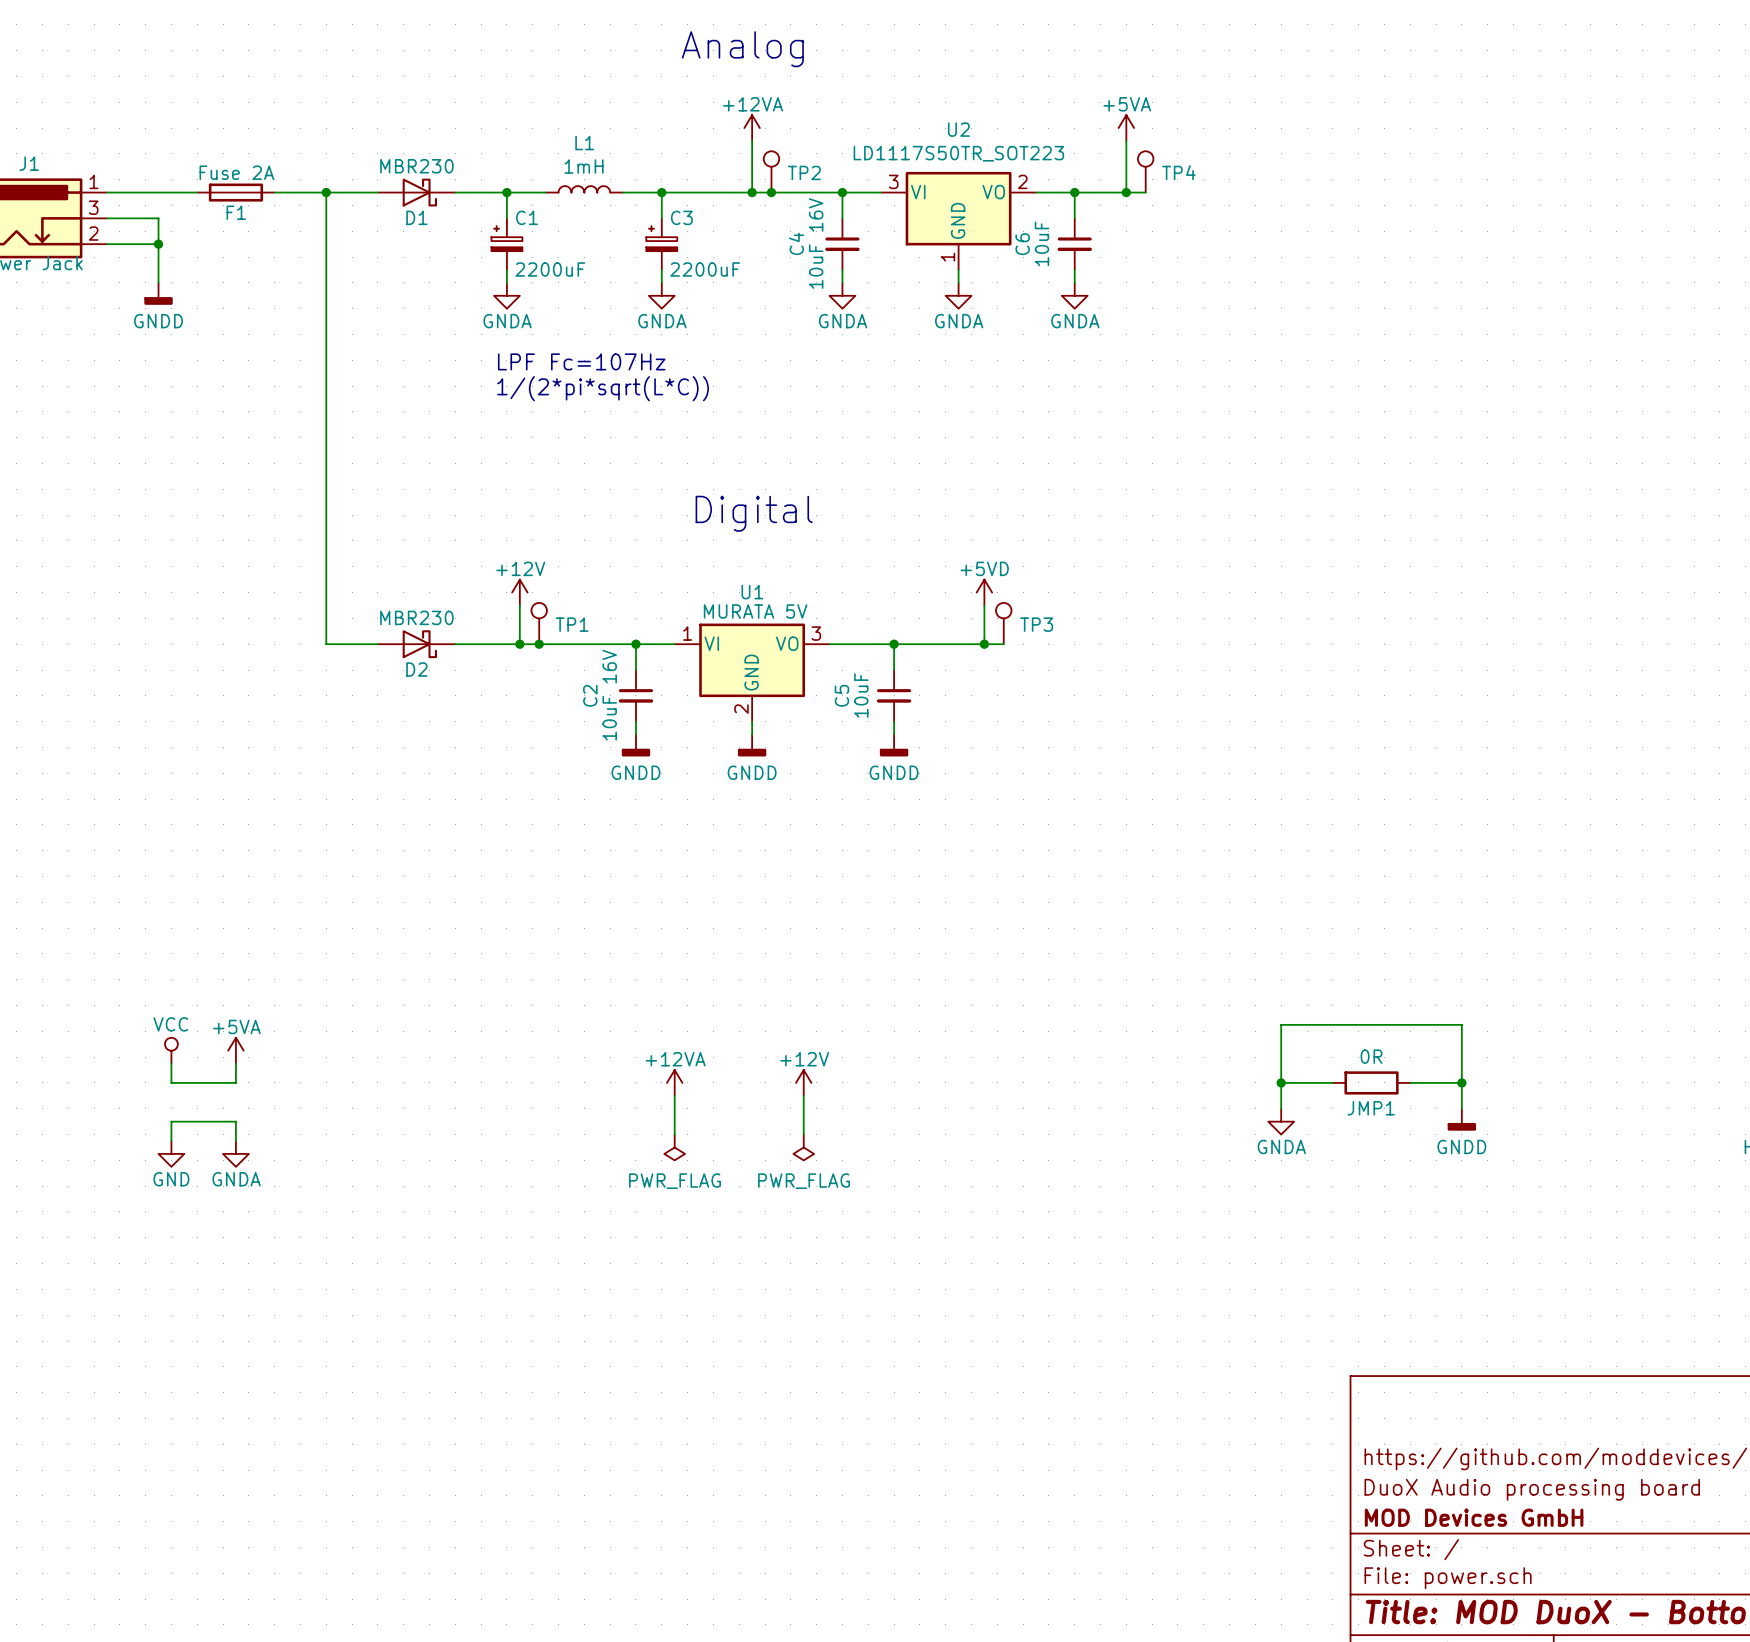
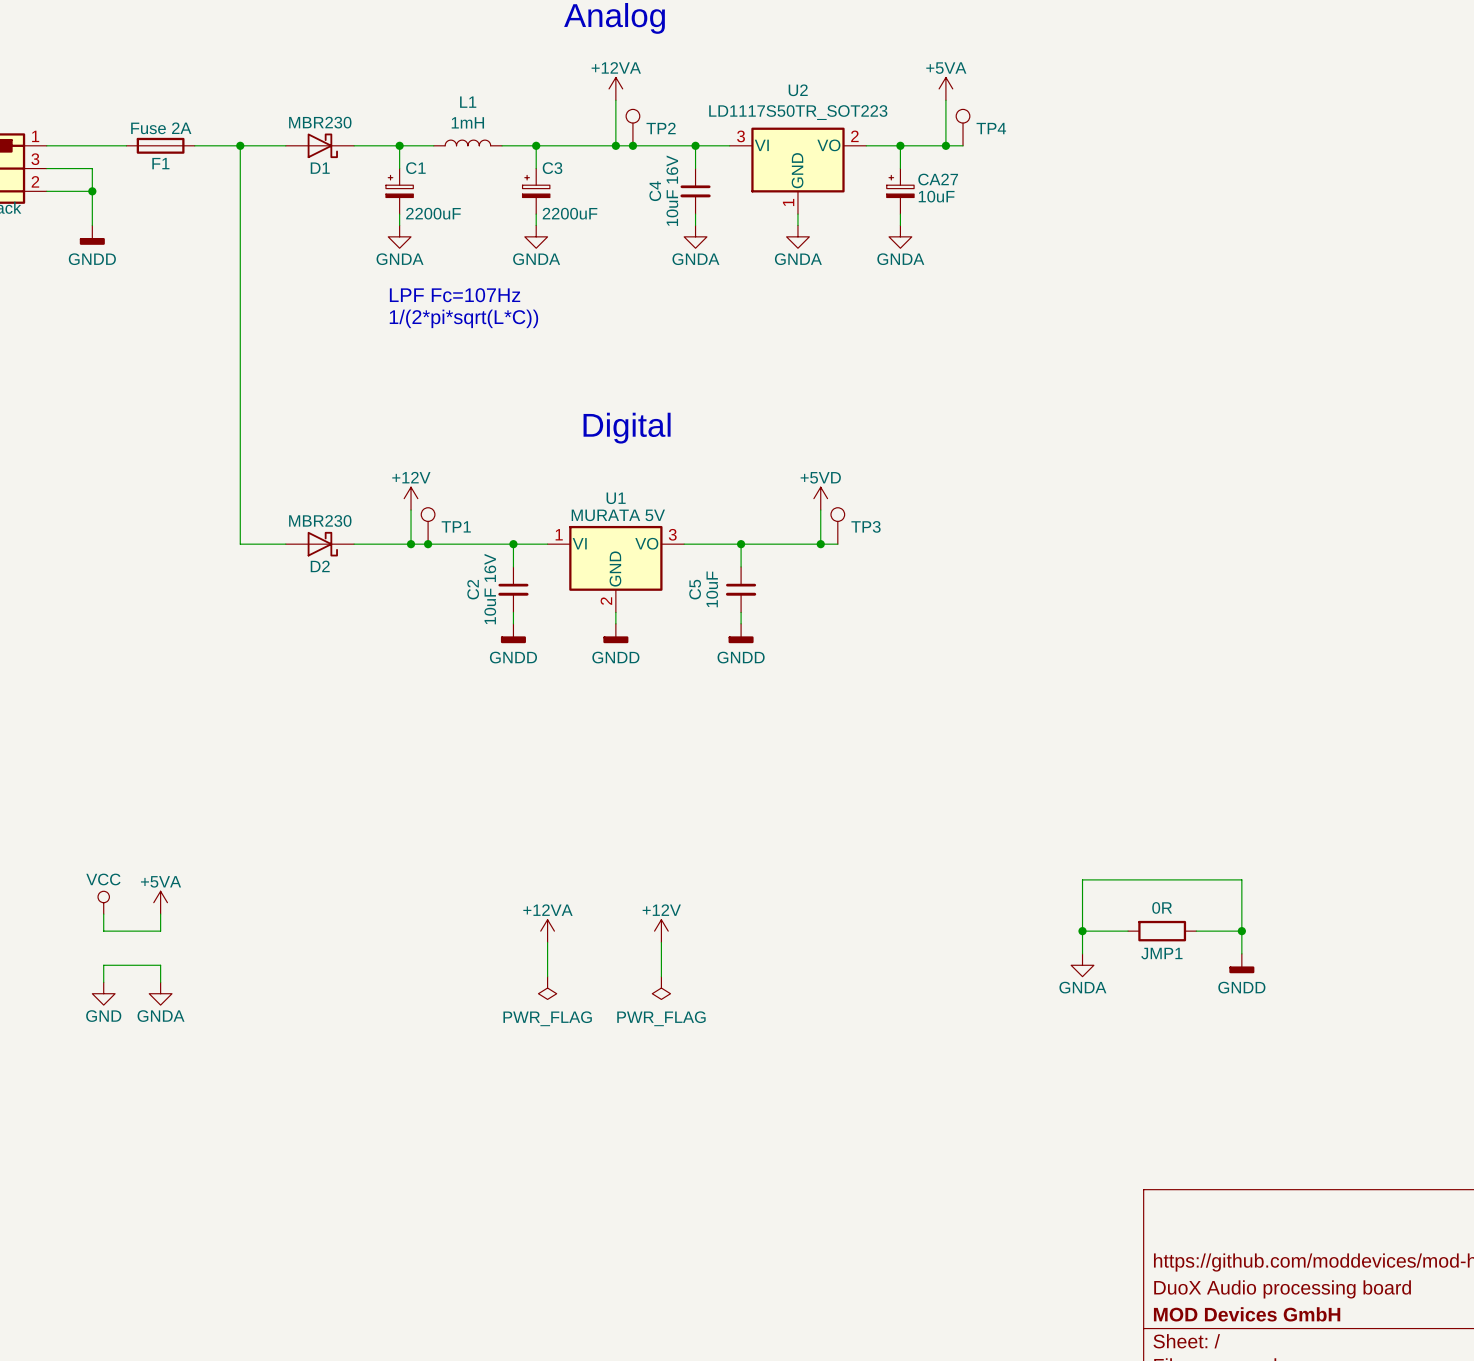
C6: 10uF (1074, 244) -> none
CA27: none -> 10uF (900, 191)

